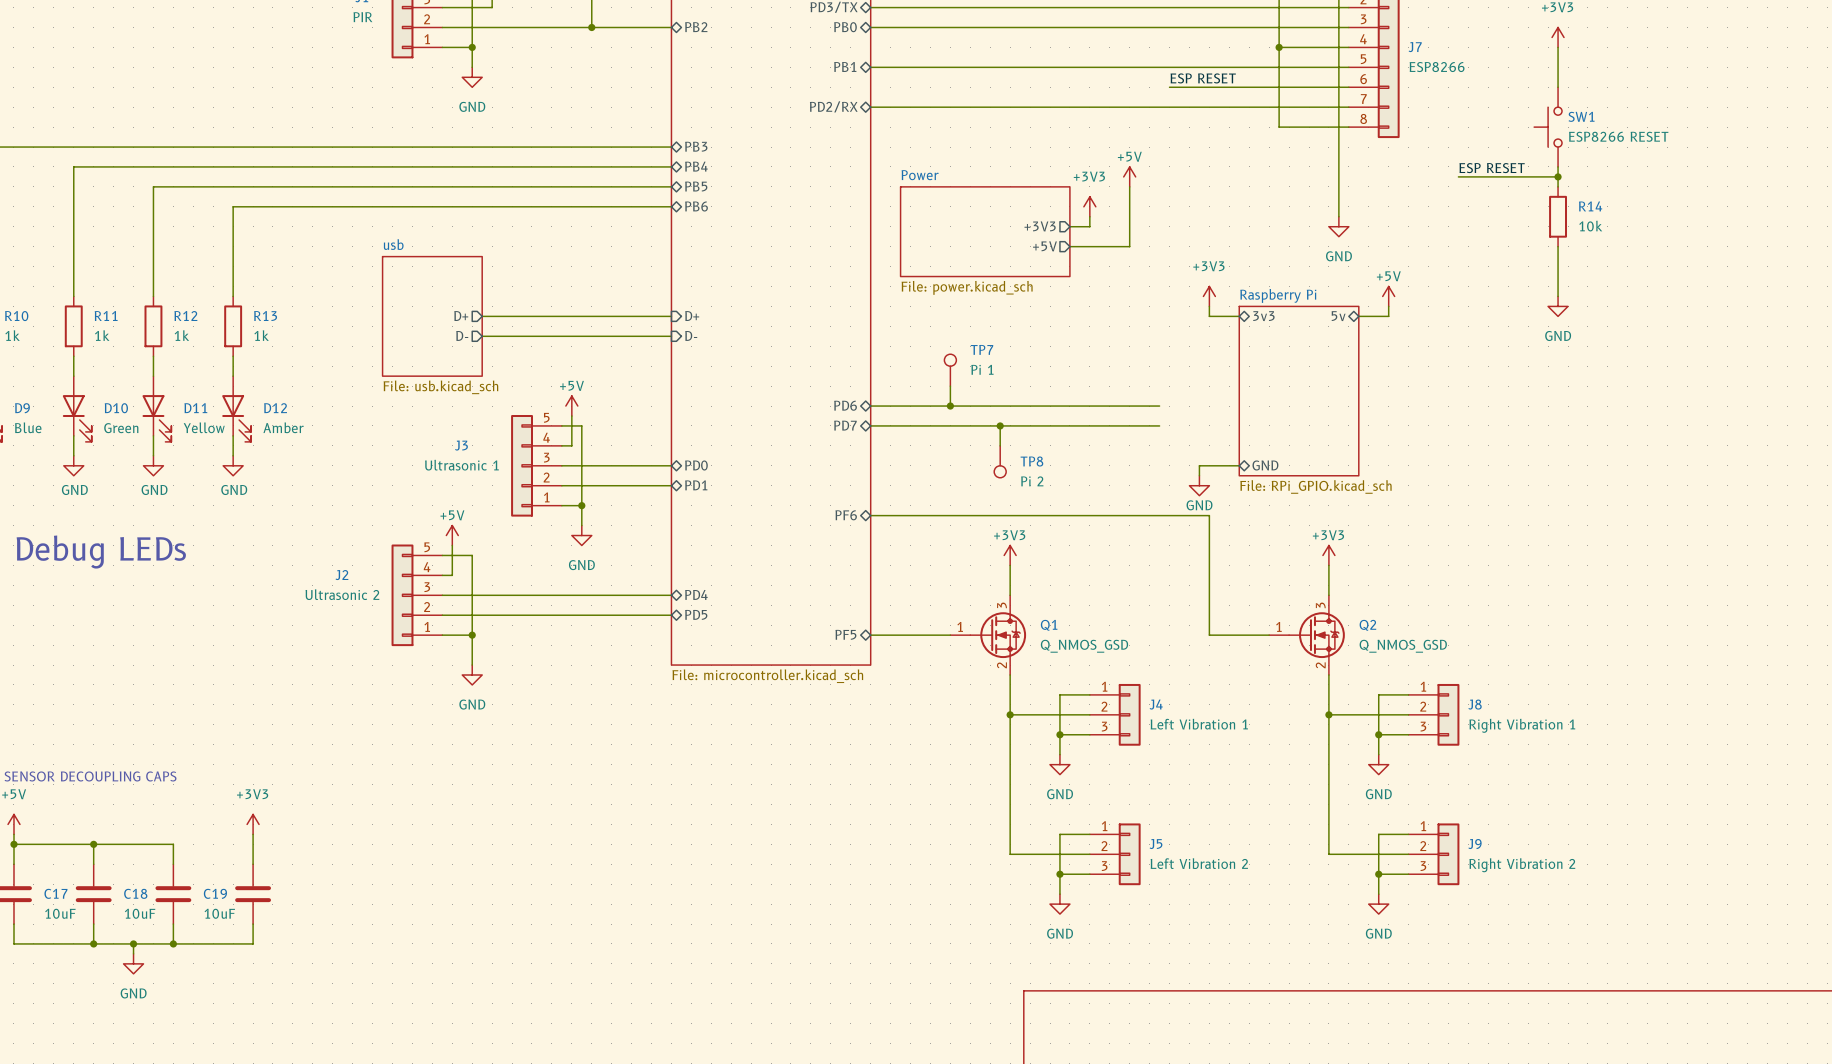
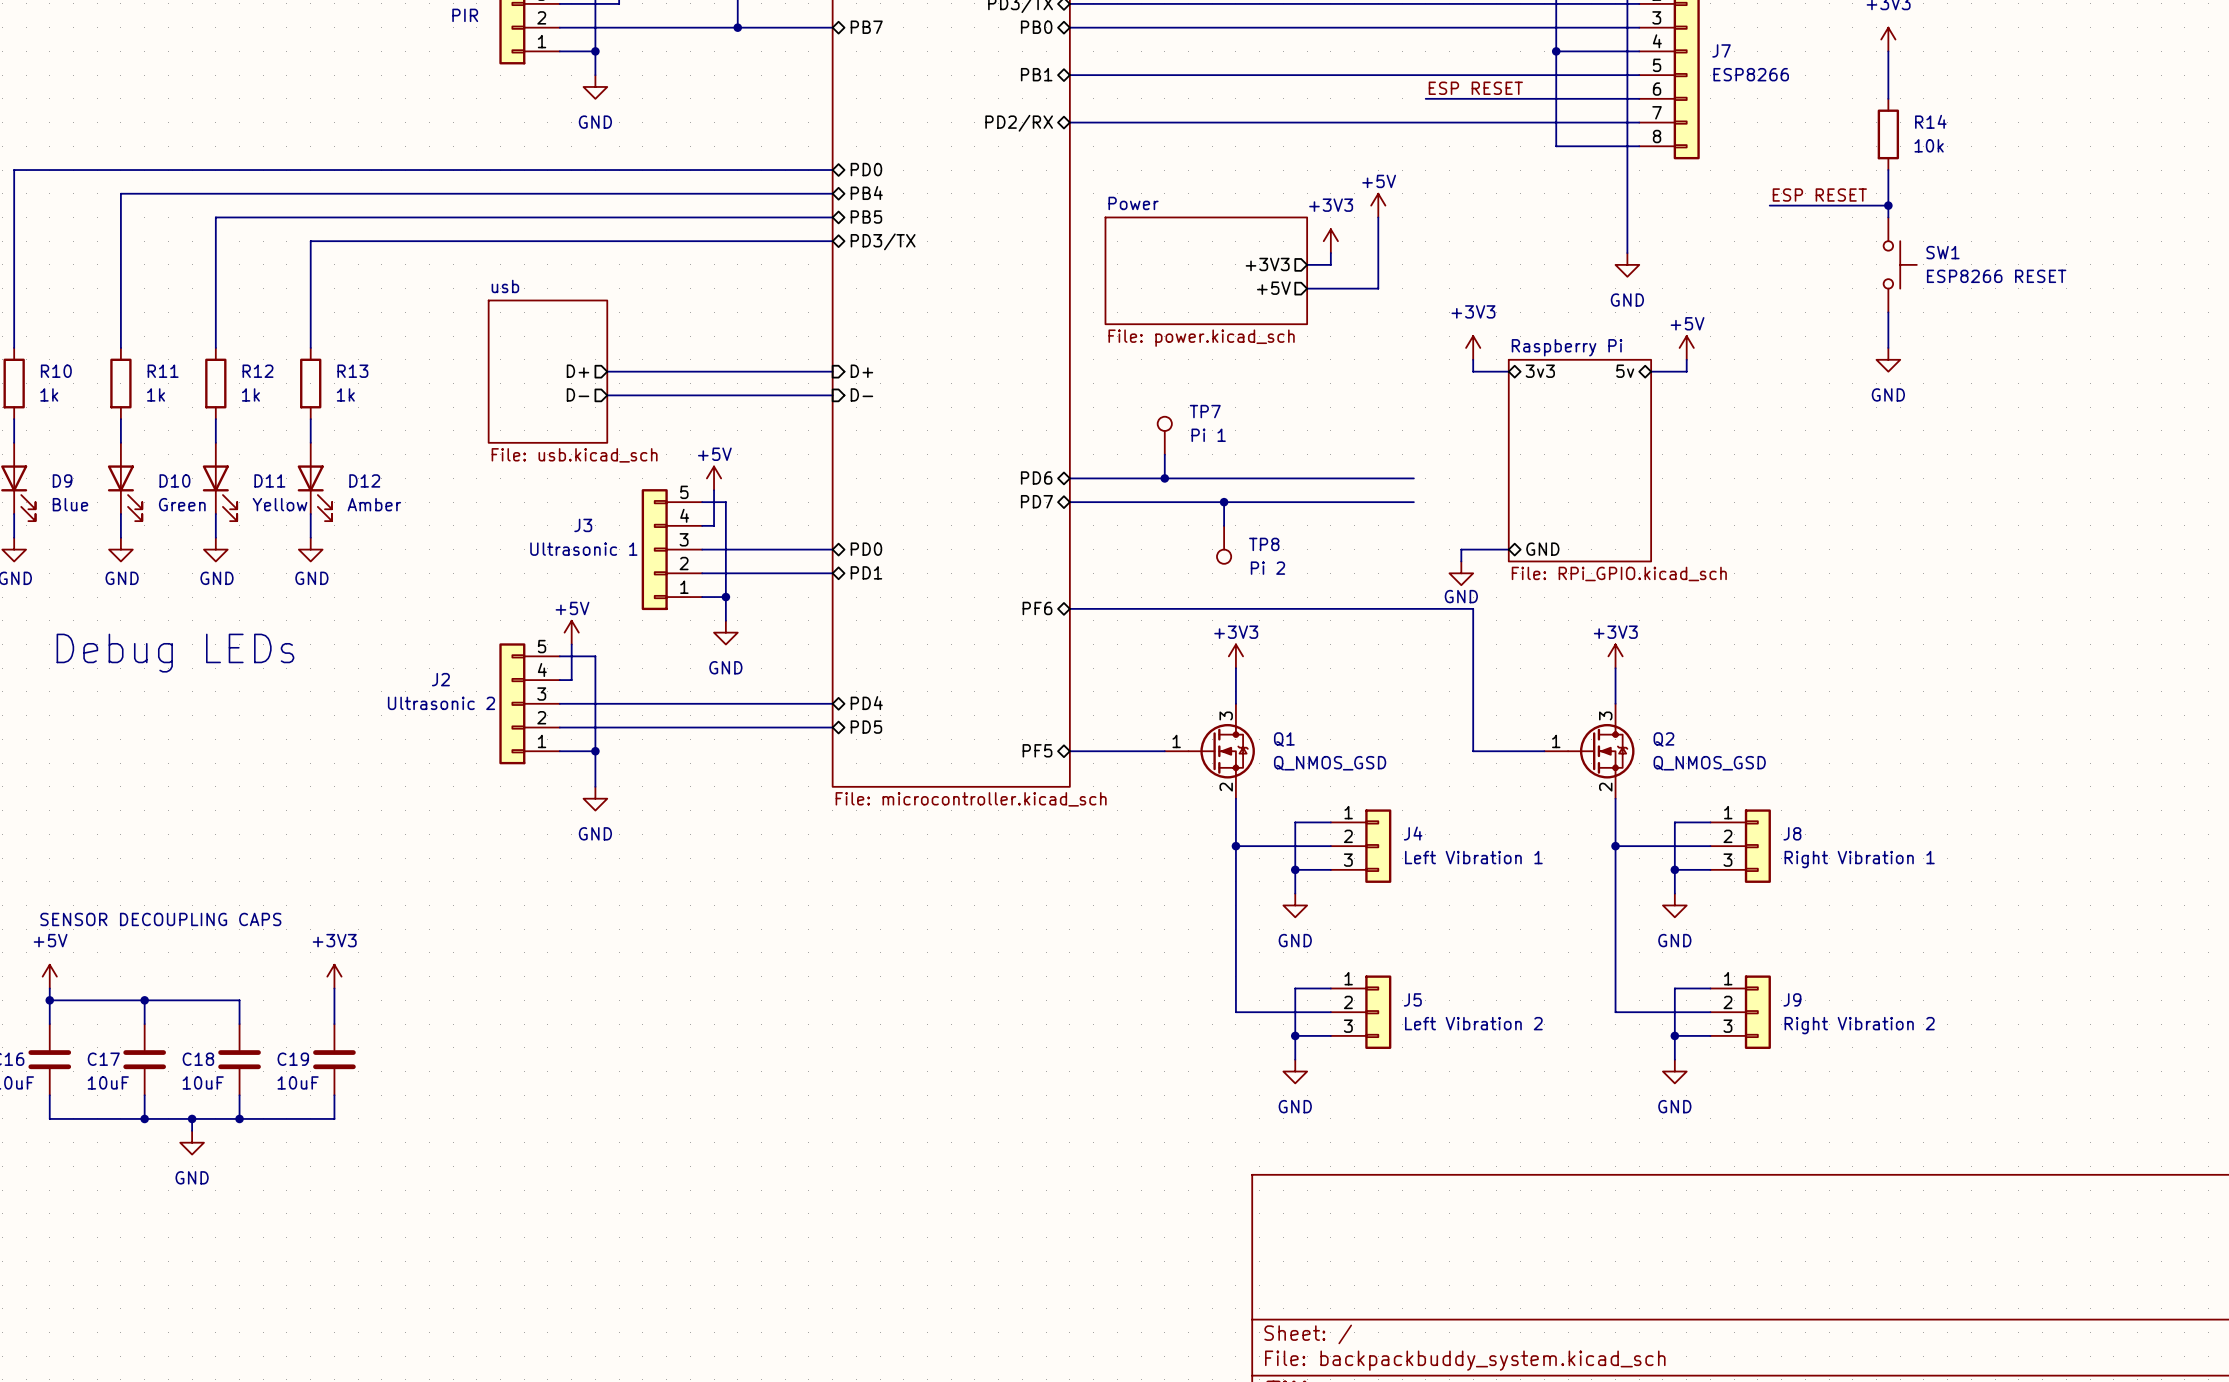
sheet pin: PB2 (696, 27) -> PB7 (866, 27)
SW1 rotation: 0° (1548, 127) -> 180° (1900, 264)
SW1 position: (1548, 127) -> (1900, 264)
sheet pin: PB3 (696, 146) -> PD0 (866, 169)
sheet pin: PB6 (696, 206) -> PD3/TX (883, 241)
R14 position: (1558, 216) -> (1888, 134)

